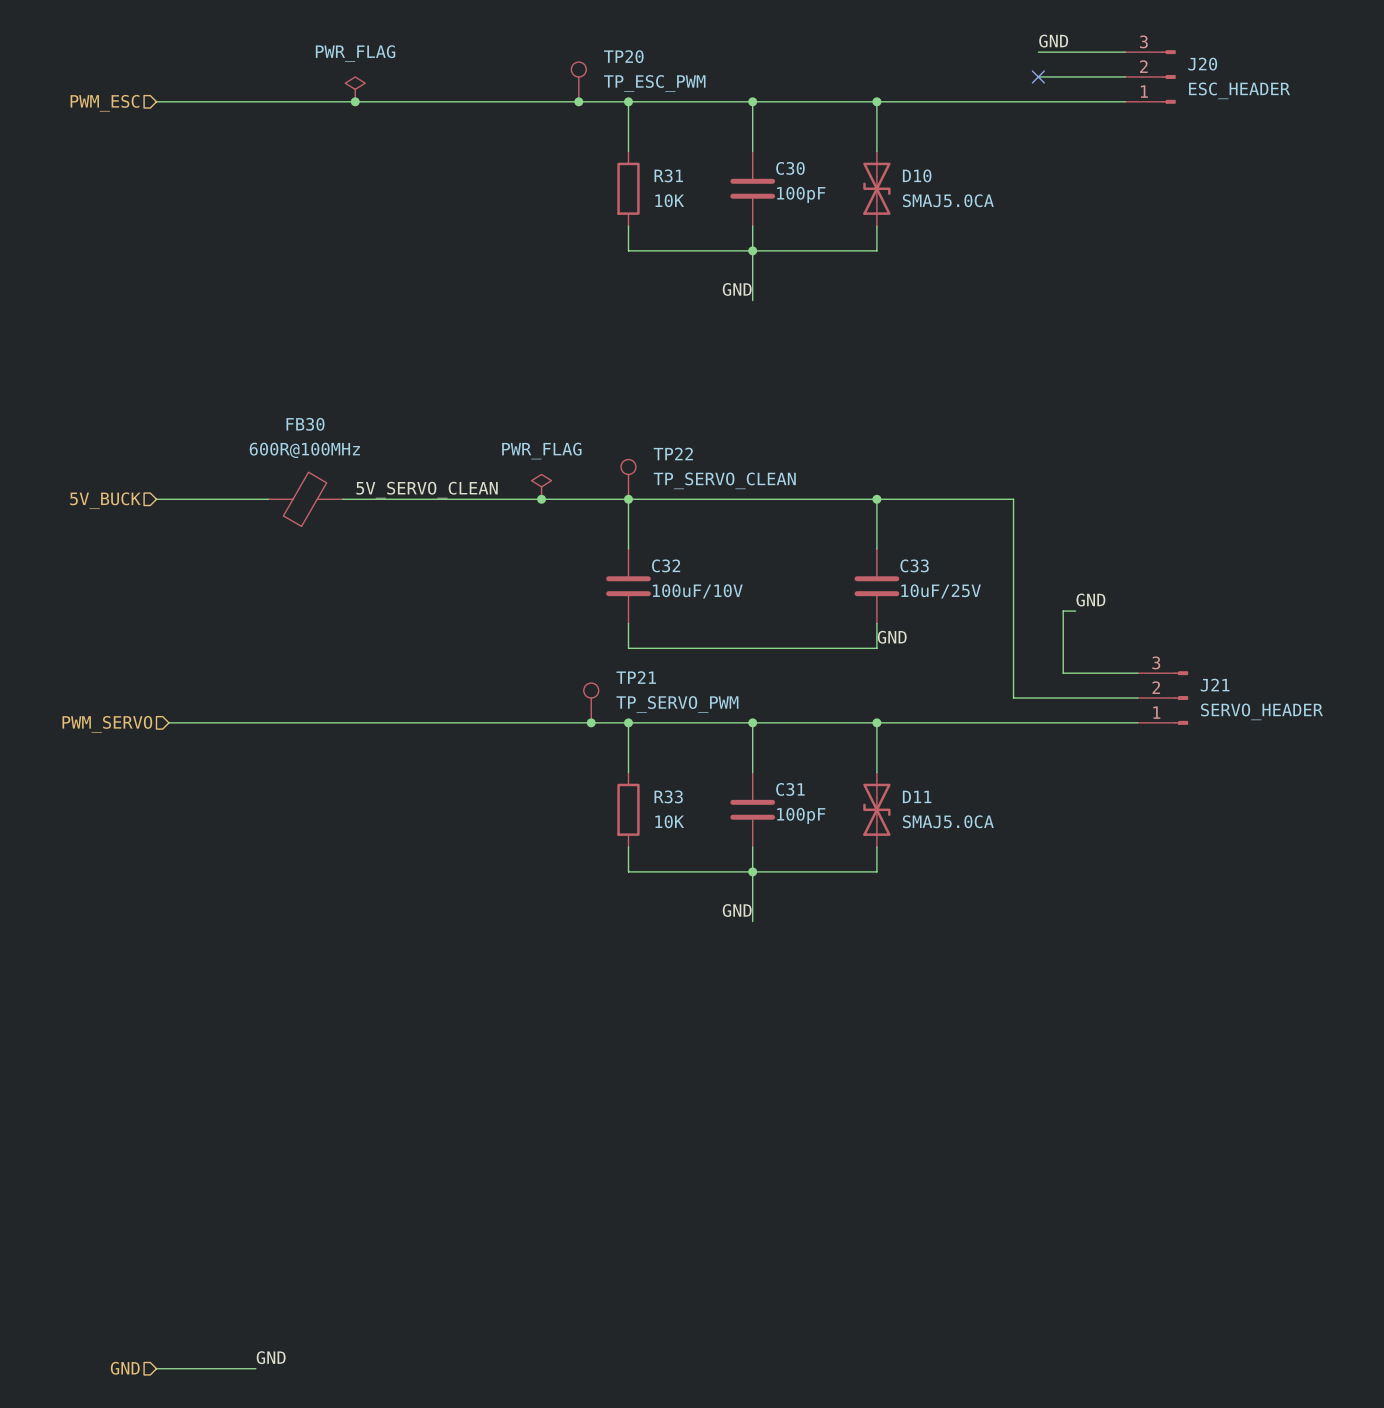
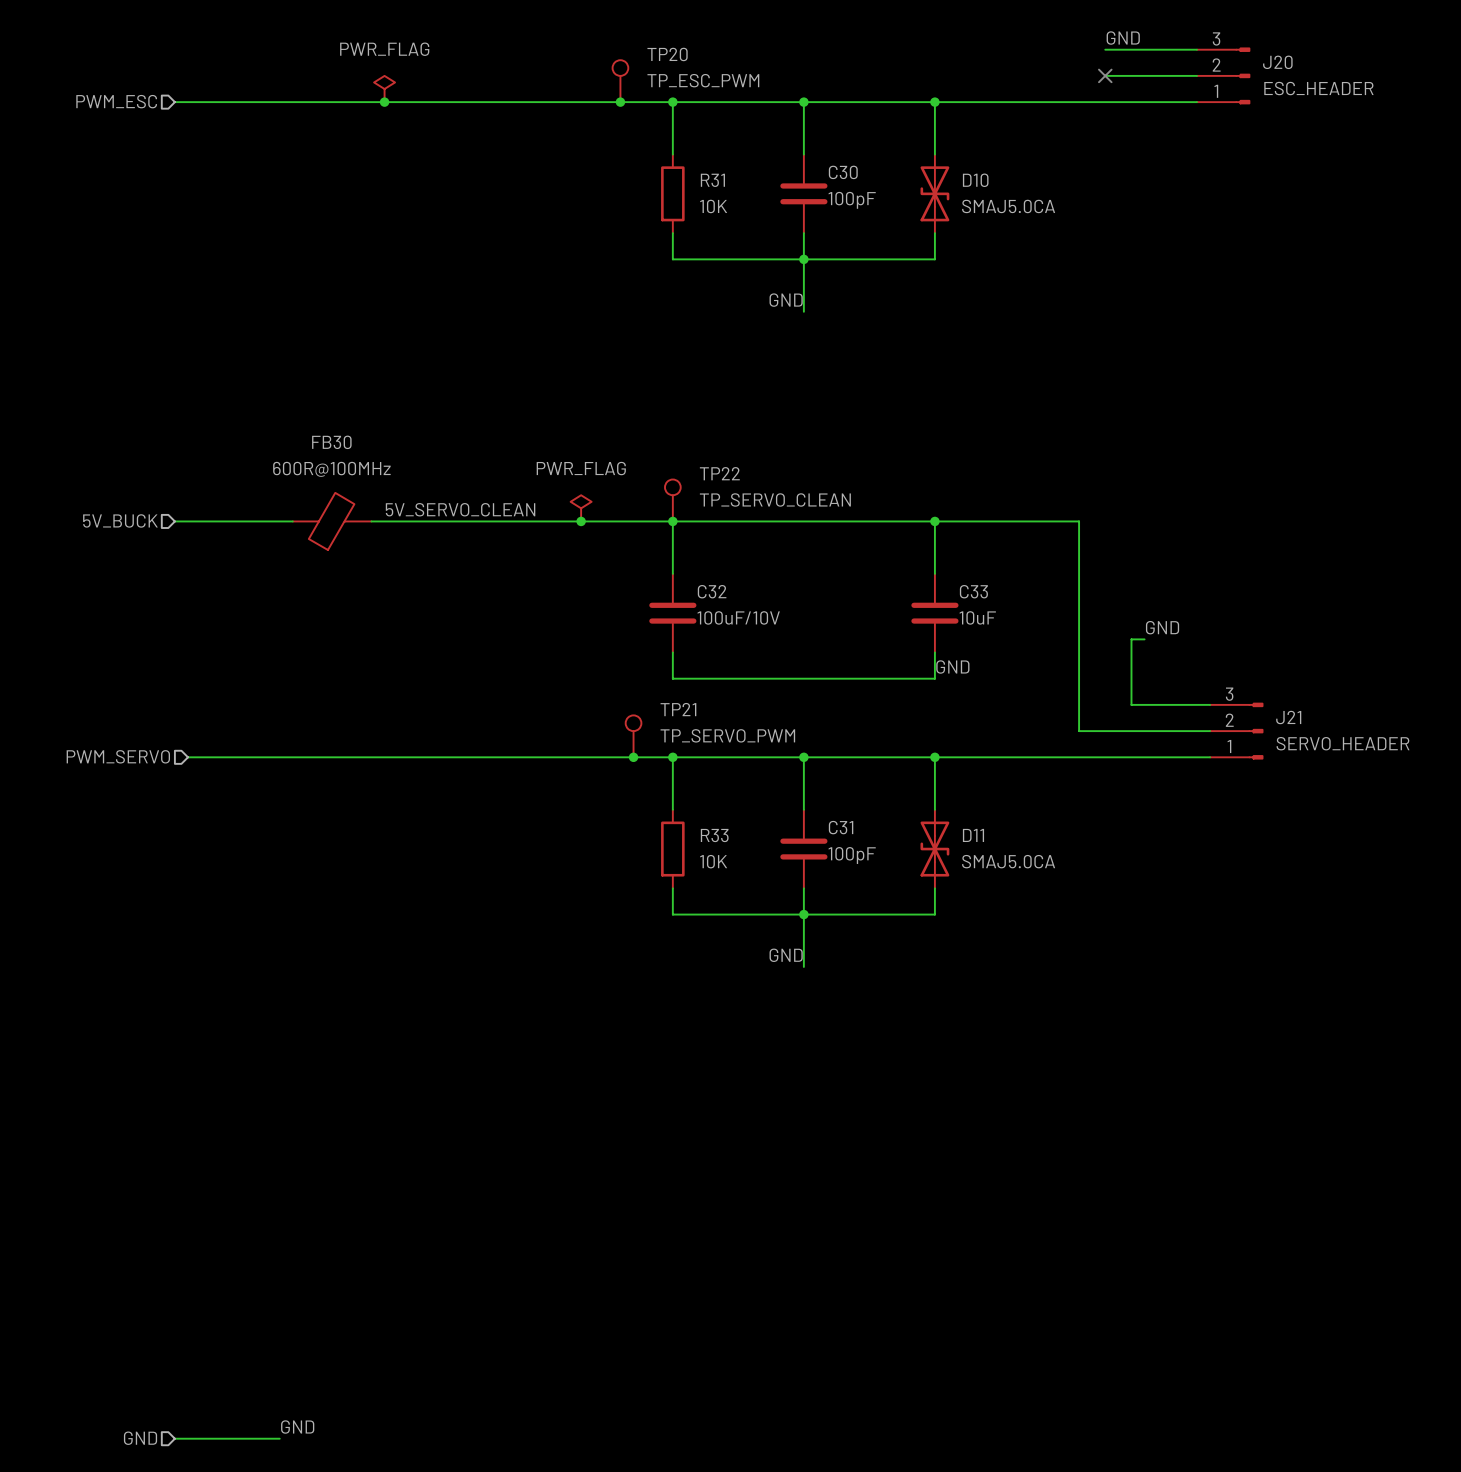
C33 value: 10uF/25V (941, 591) -> 10uF (977, 617)

